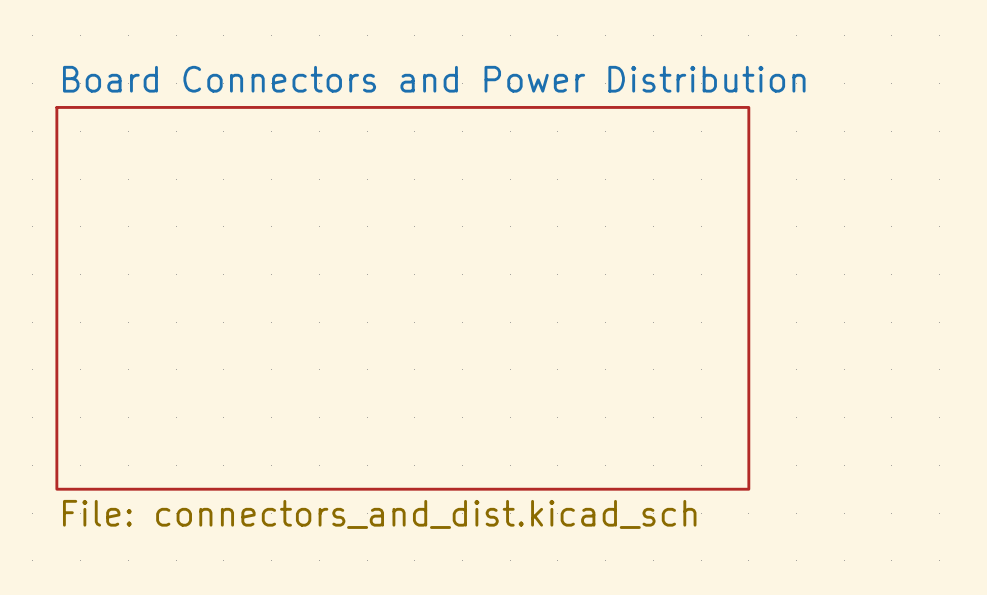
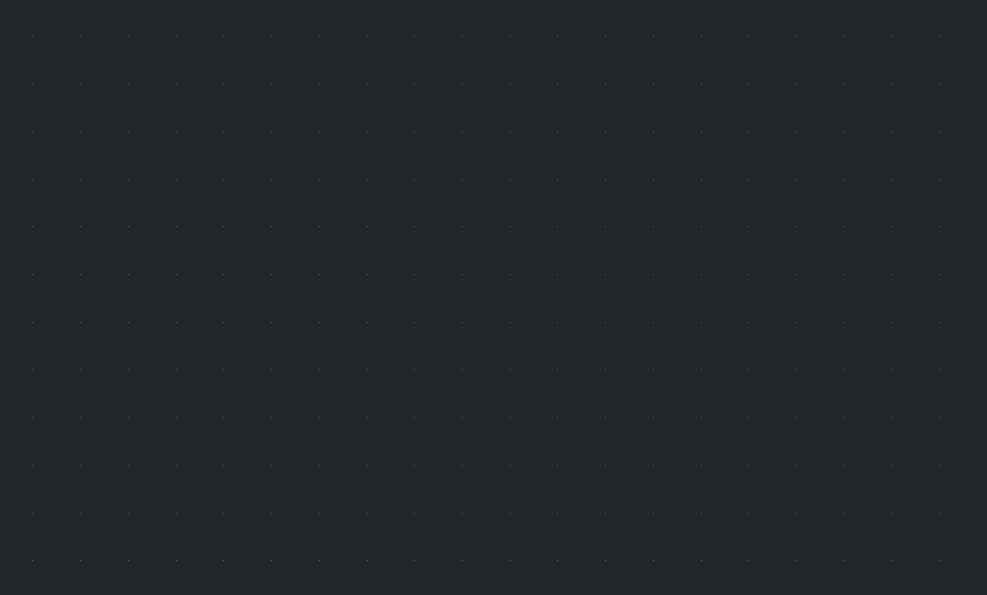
sheet Board Connectors and Power Distribution: File: connectors_and_dist.kicad_sch (402, 298) -> none

